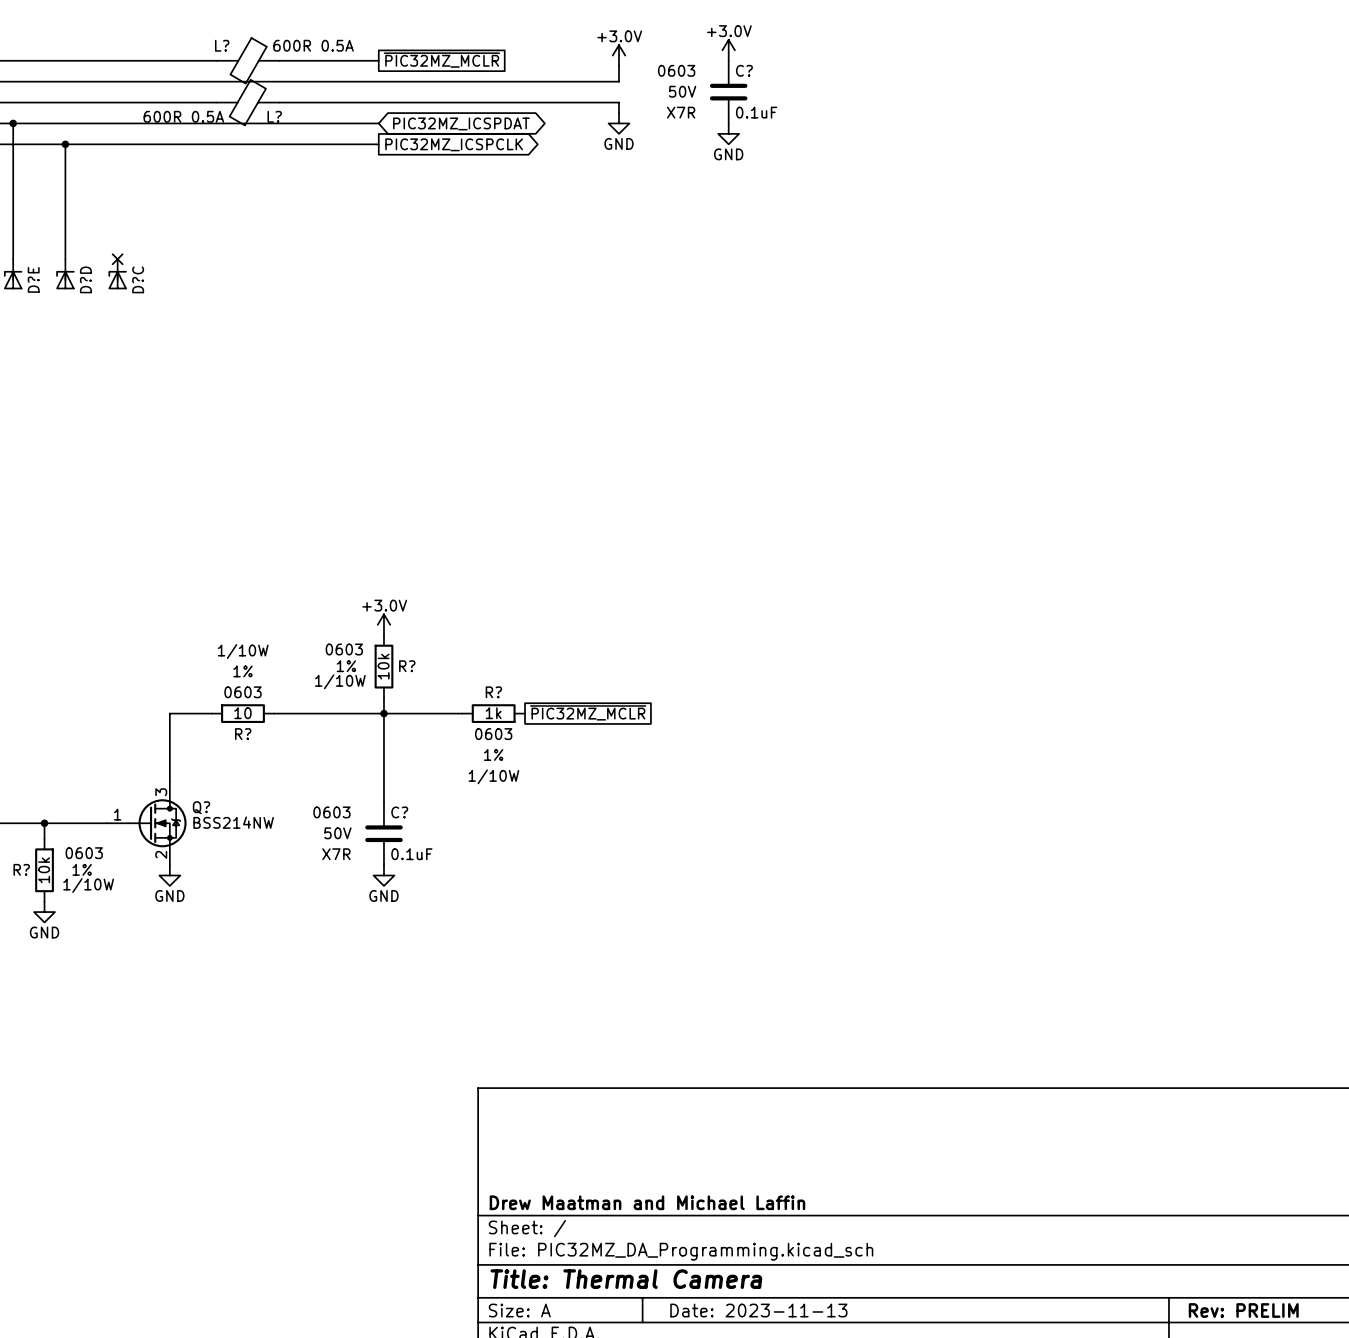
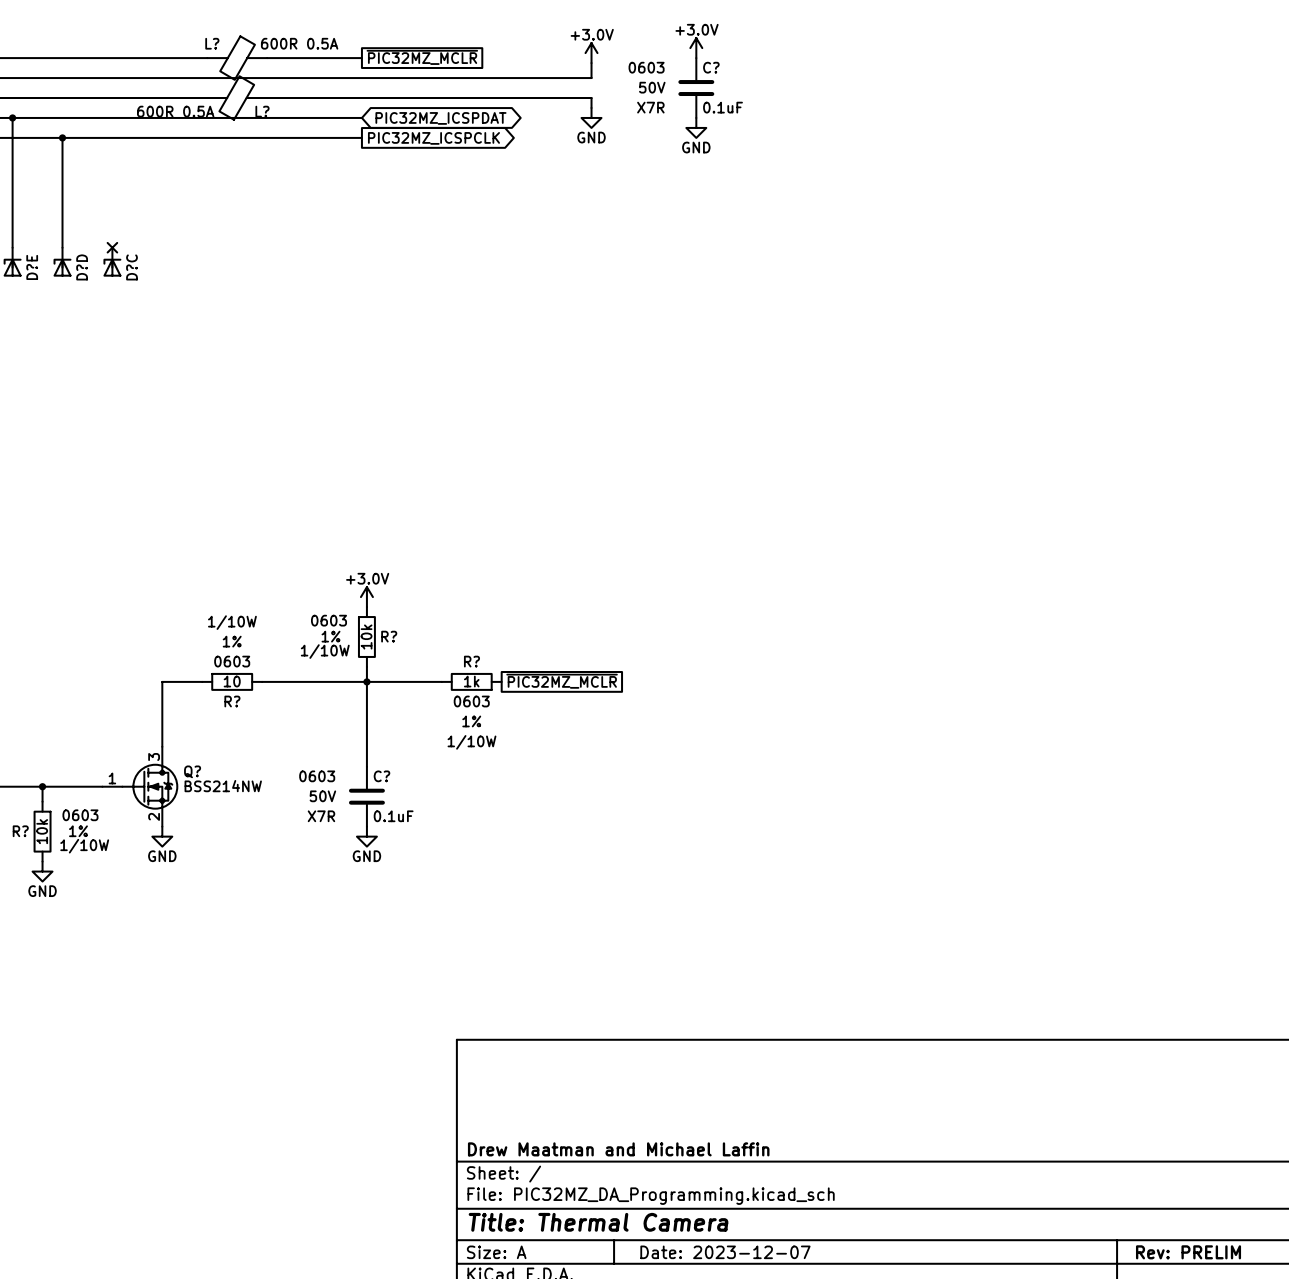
title block: Date: 2023-11-13 (758, 1310) -> Date: 2023-12-07 (725, 1252)

